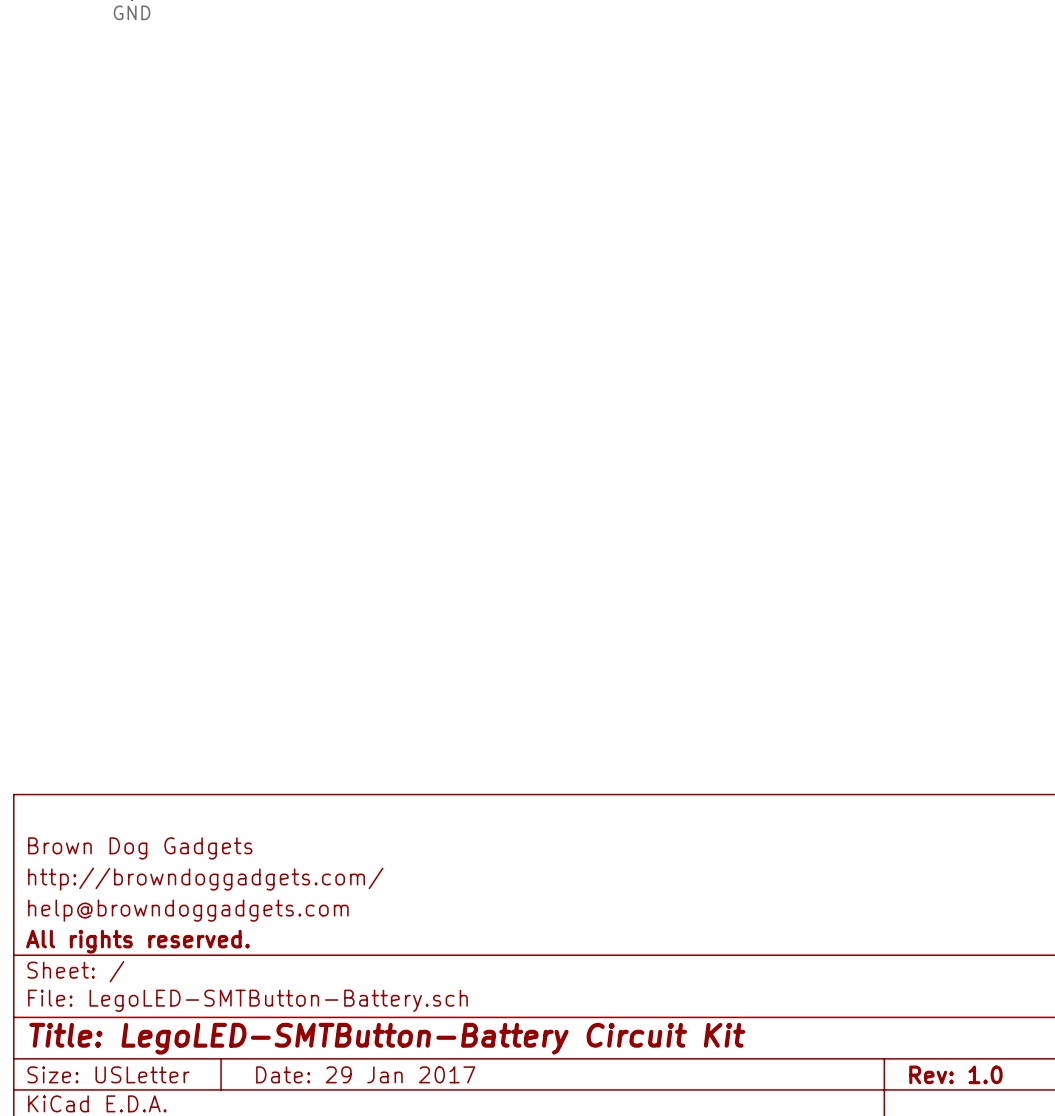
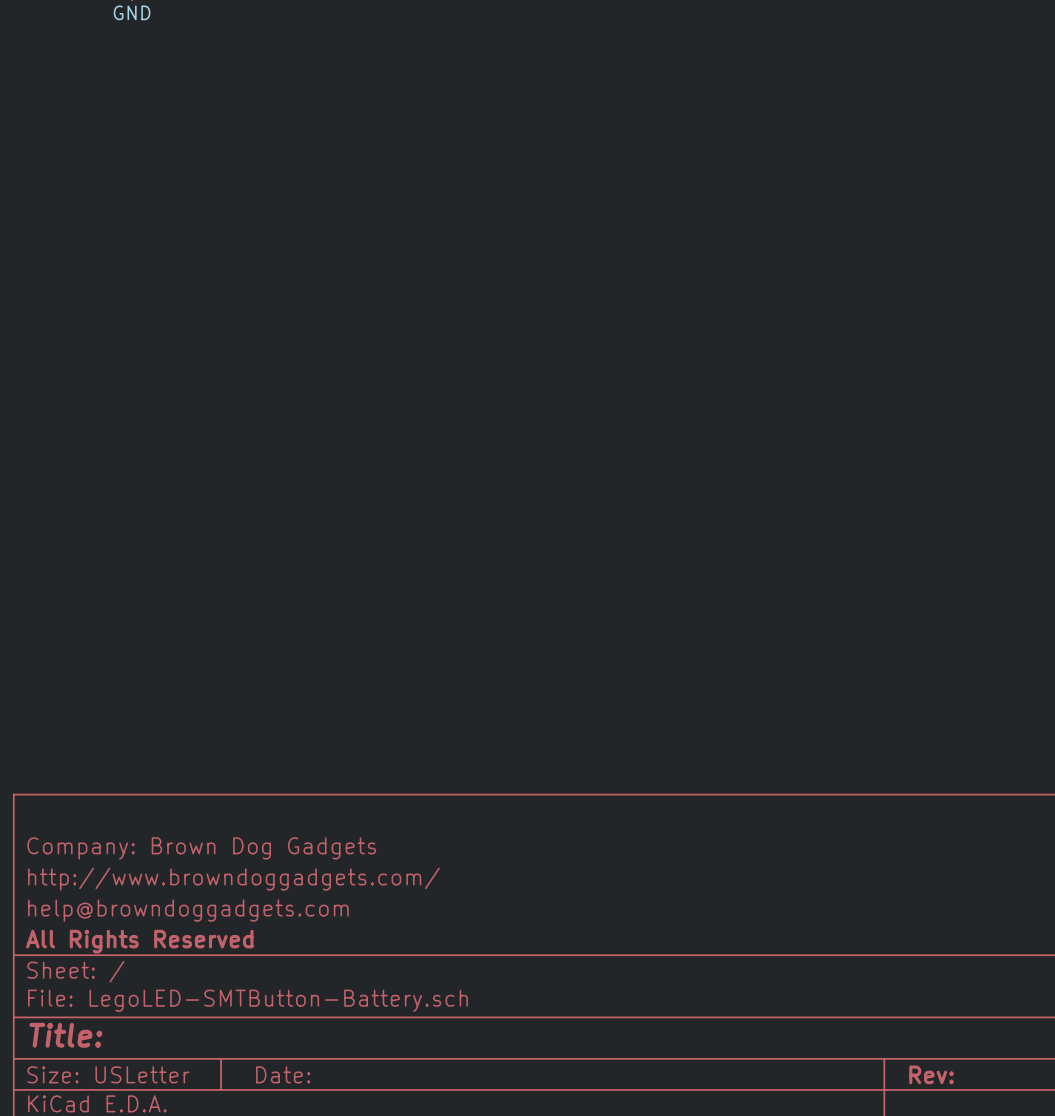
title block: Brown Dog Gadgets (140, 848) -> Company: Brown Dog Gadgets (201, 848)
title block: http://browndoggadgets.com/ (205, 879) -> http://www.browndoggadgets.com/ (233, 879)
title block: All rights reserved. (137, 941) -> All Rights Reserved (139, 941)
title block: Title: LegoLED-SMTButton-Battery Circuit Kit (387, 1038) -> Title: (65, 1035)
title block: Date: 29 Jan 2017 (365, 1074) -> Date: (283, 1074)
title block: Rev: 1.0 (955, 1074) -> Rev: (931, 1074)

